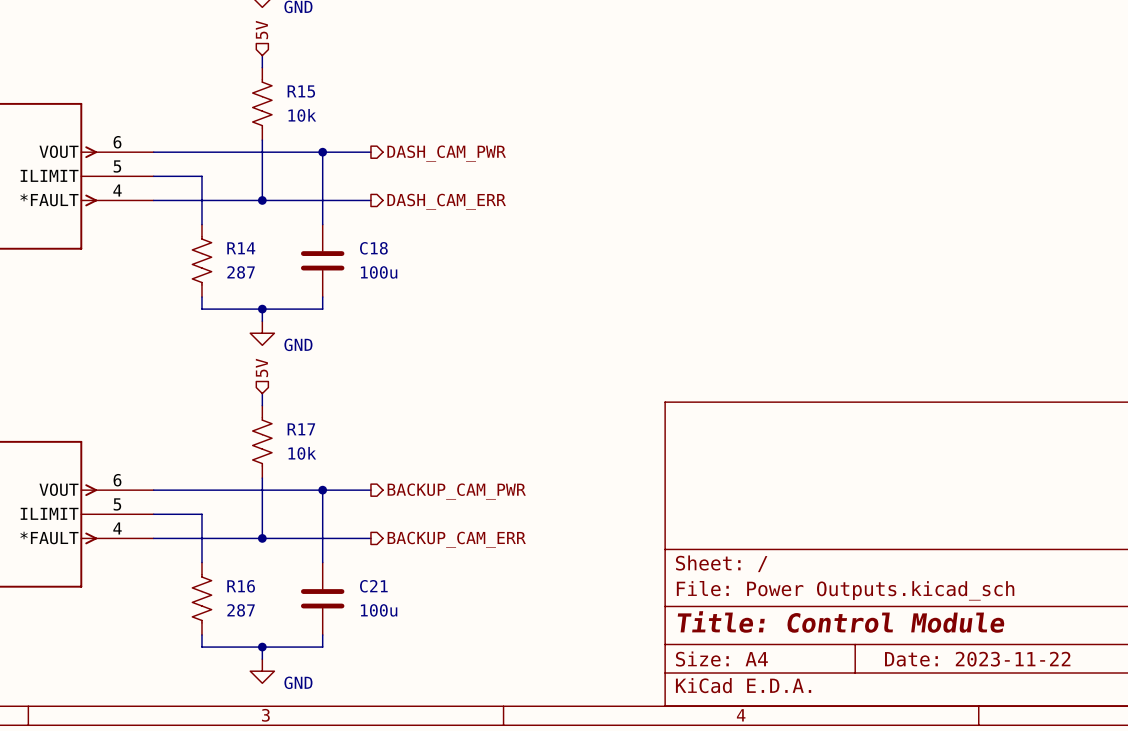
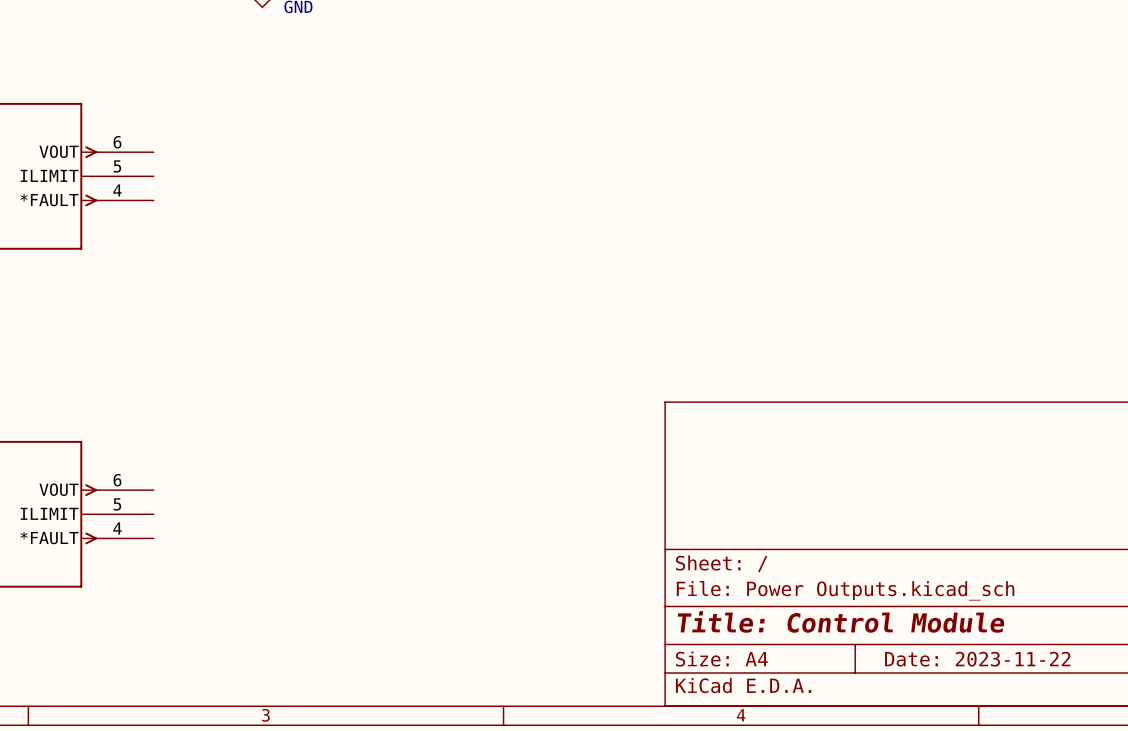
hierarchical label: 5V (262, 29) -> none
wire: (262, 55) (262, 67) -> none
R15: 10k (262, 103) -> none
wire: (262, 140) (262, 200) -> none
wire: (153, 152) (370, 152) -> none
wire: (322, 152) (322, 224) -> none
junction: (322, 152) -> none
hierarchical label: DASH_CAM_PWR (446, 153) -> none
wire: (153, 176) (201, 176) (201, 224) -> none
wire: (153, 200) (370, 200) -> none
junction: (262, 200) -> none
hierarchical label: DASH_CAM_ERR (446, 201) -> none
R14: 287 (201, 260) -> none
C18: 100u (322, 260) -> none
wire: (201, 297) (201, 309) (322, 309) (322, 297) -> none
wire: (262, 309) (262, 321) -> none
junction: (262, 309) -> none
power symbol: GND (262, 333) -> none
hierarchical label: 5V (262, 367) -> none
wire: (262, 393) (262, 405) -> none
R17: 10k (262, 441) -> none
wire: (262, 478) (262, 538) -> none
wire: (153, 490) (370, 490) -> none
wire: (322, 490) (322, 562) -> none
junction: (322, 490) -> none
hierarchical label: BACKUP_CAM_PWR (456, 491) -> none
wire: (153, 514) (201, 514) (201, 562) -> none
wire: (153, 538) (370, 538) -> none
junction: (262, 538) -> none
hierarchical label: BACKUP_CAM_ERR (456, 539) -> none
R16: 287 (201, 598) -> none
C21: 100u (322, 598) -> none
wire: (201, 634) (201, 647) (322, 647) (322, 634) -> none
wire: (262, 647) (262, 659) -> none
junction: (262, 647) -> none
power symbol: GND (262, 671) -> none

